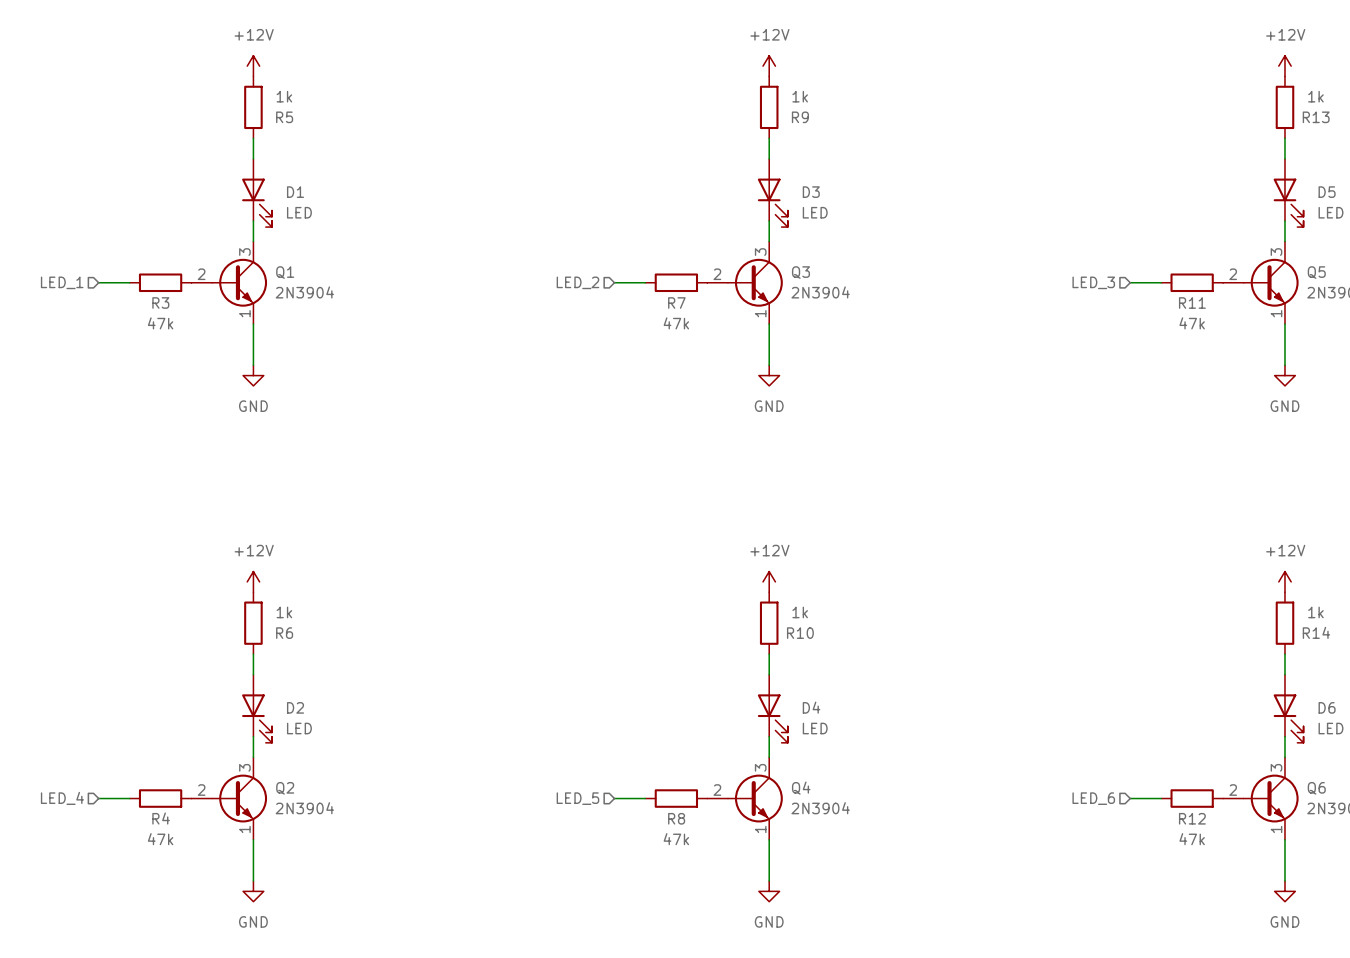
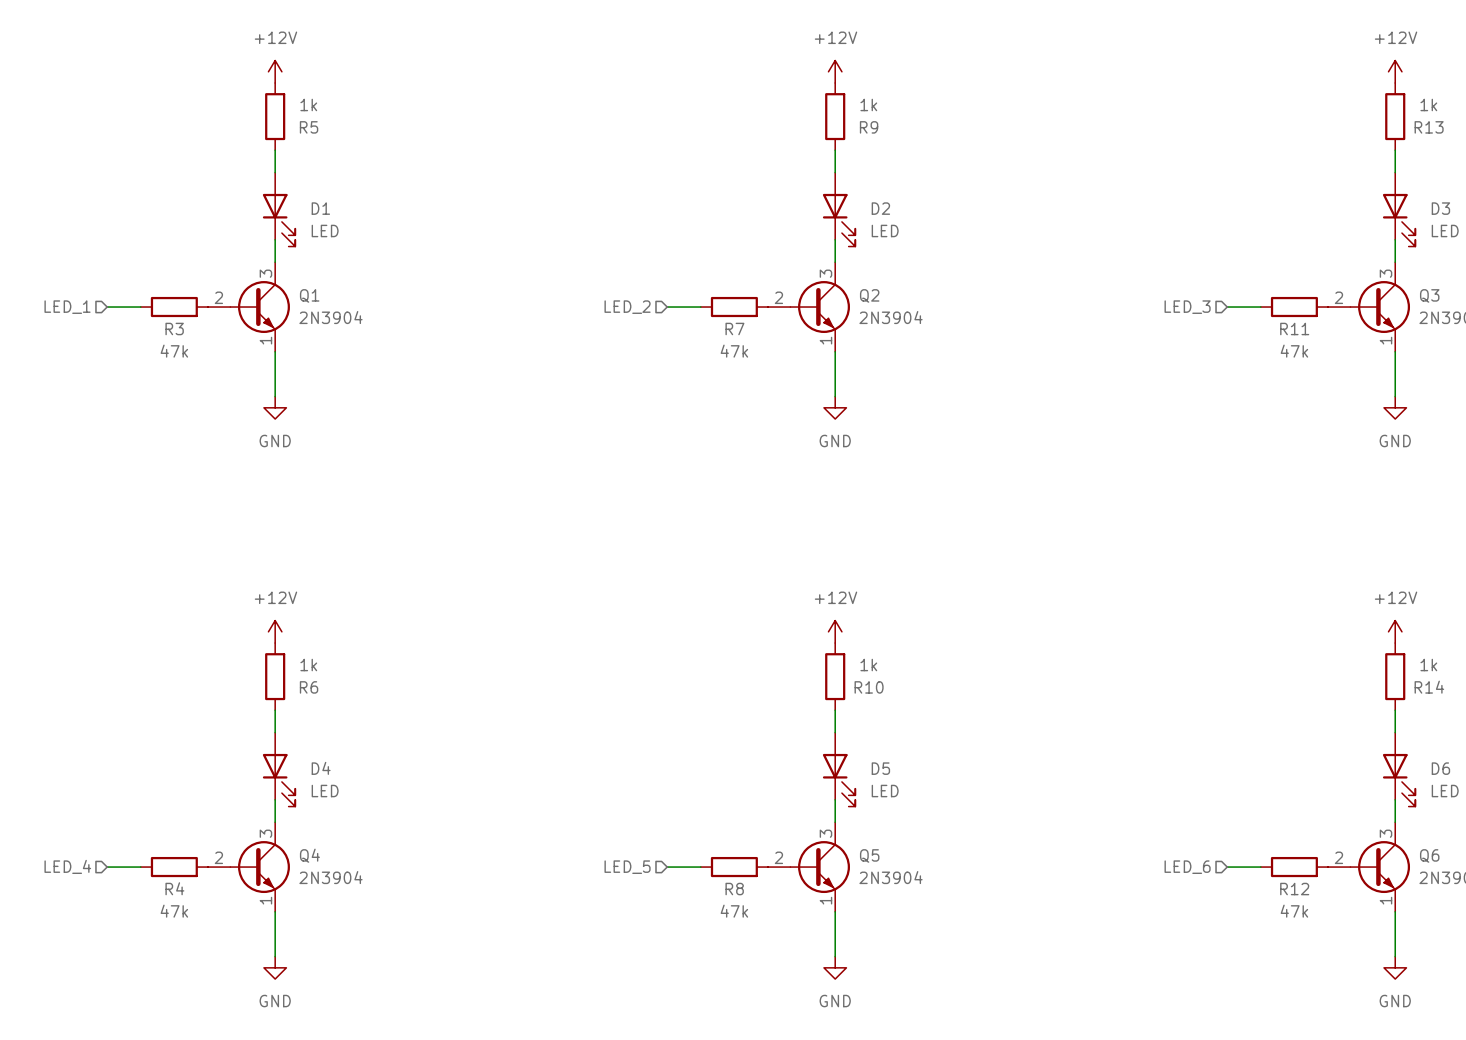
D3 name: D3 (811, 192) -> D2 (880, 208)
D5 name: D5 (1327, 192) -> D3 (1440, 208)
Q3 name: Q3 (800, 272) -> Q2 (869, 295)
Q5 name: Q5 (1316, 272) -> Q3 (1429, 295)
D2 name: D2 (295, 707) -> D4 (321, 768)
D4 name: D4 (811, 707) -> D5 (880, 768)
Q2 name: Q2 (285, 788) -> Q4 (309, 855)
Q4 name: Q4 (801, 788) -> Q5 (869, 855)

